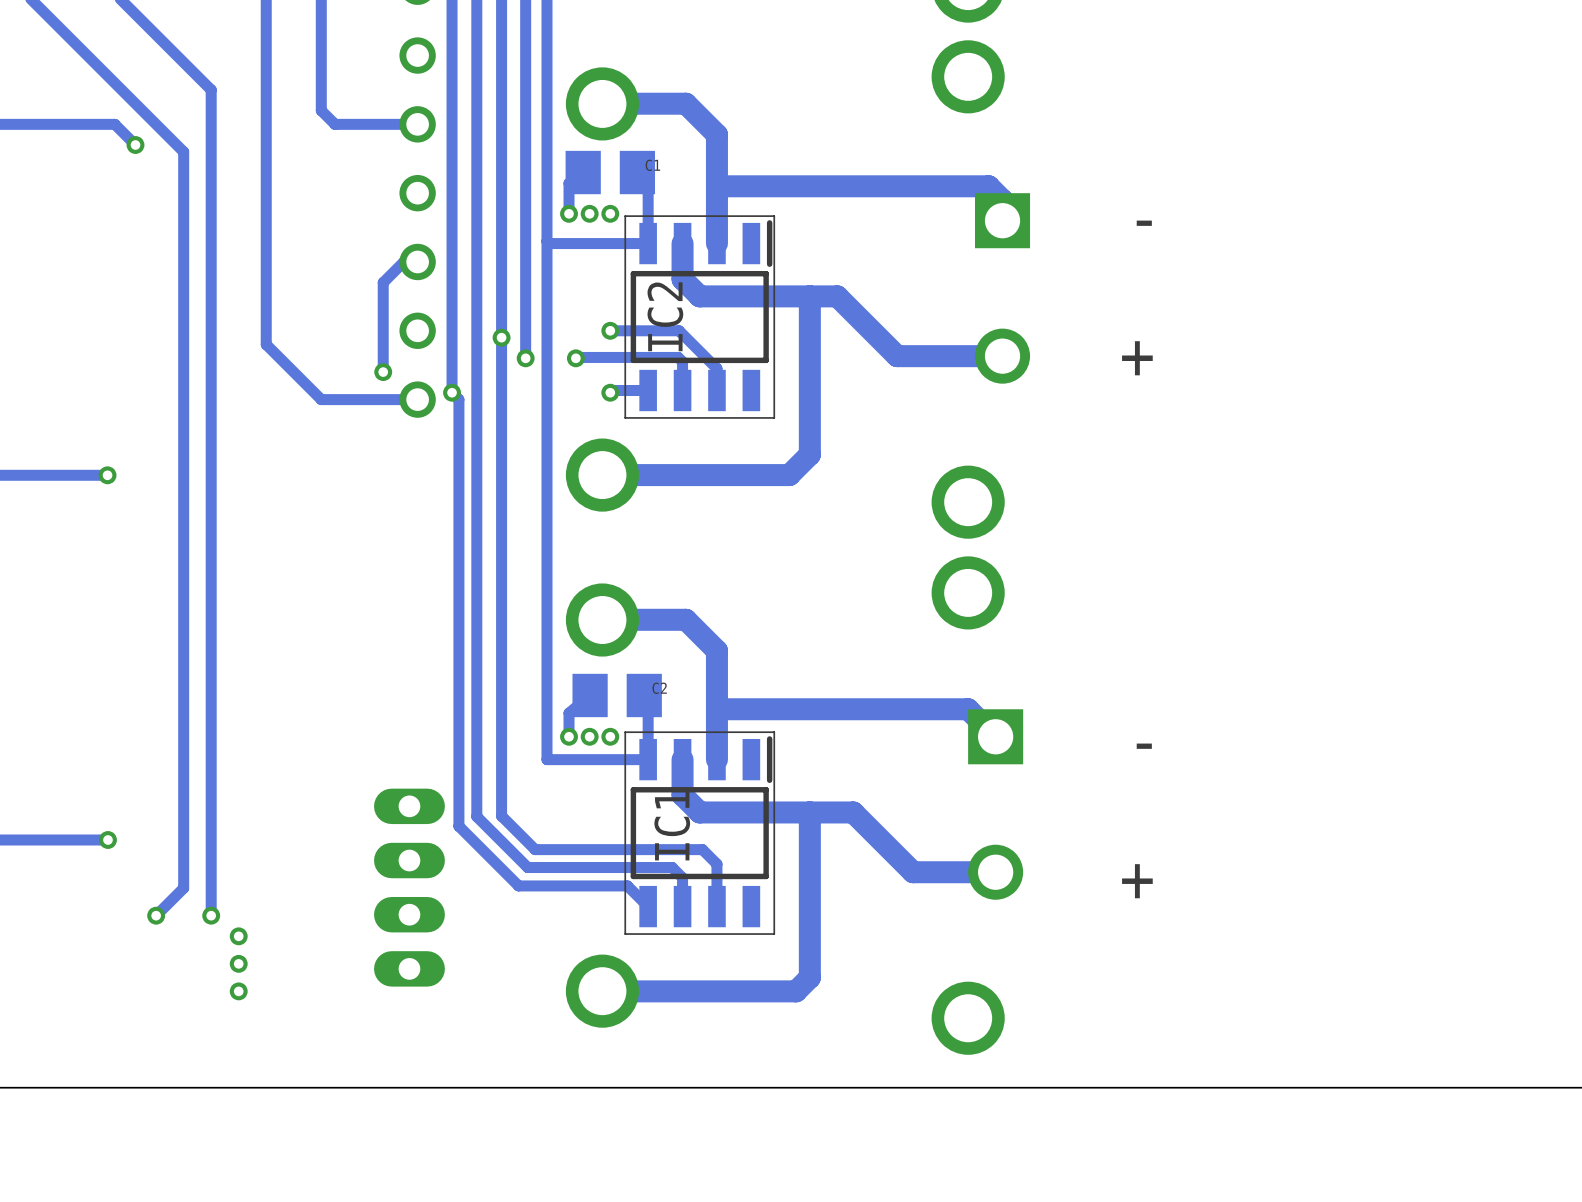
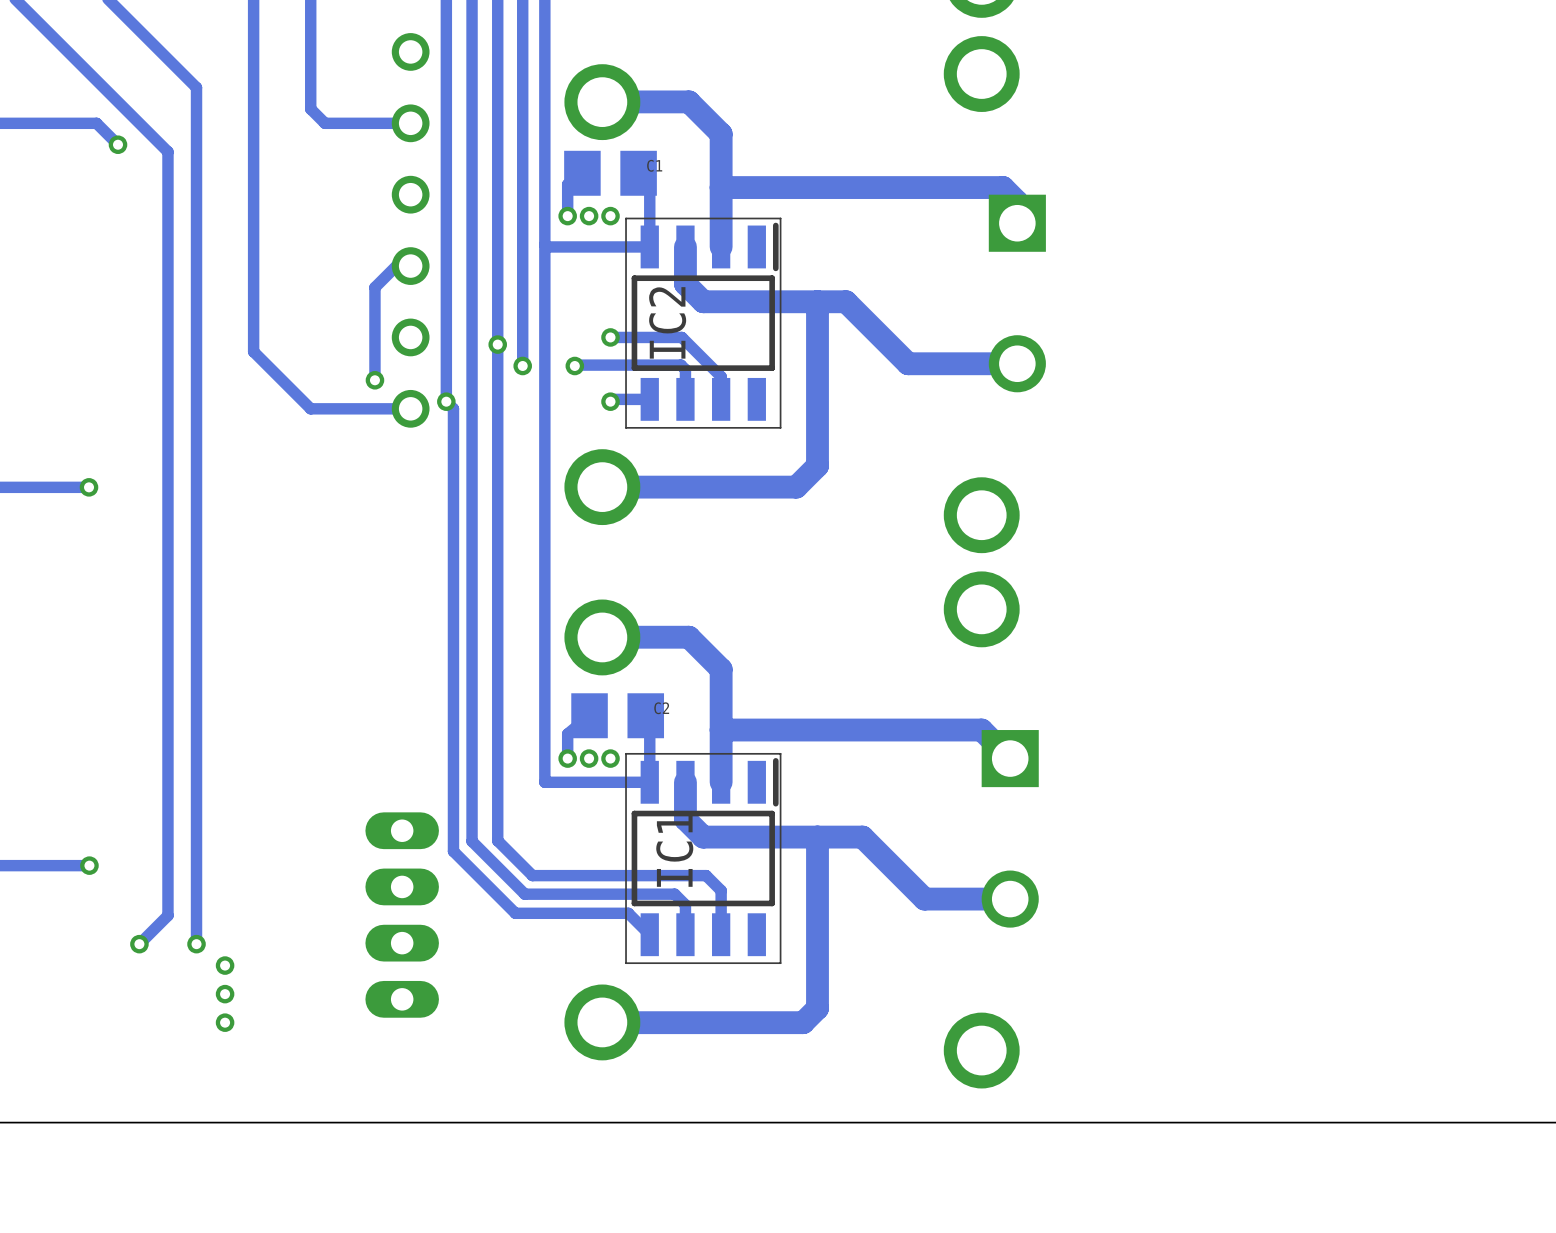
text: - (1144, 223) -> none
text: + (1137, 358) -> none
text: - (1144, 746) -> none
text: + (1137, 881) -> none

